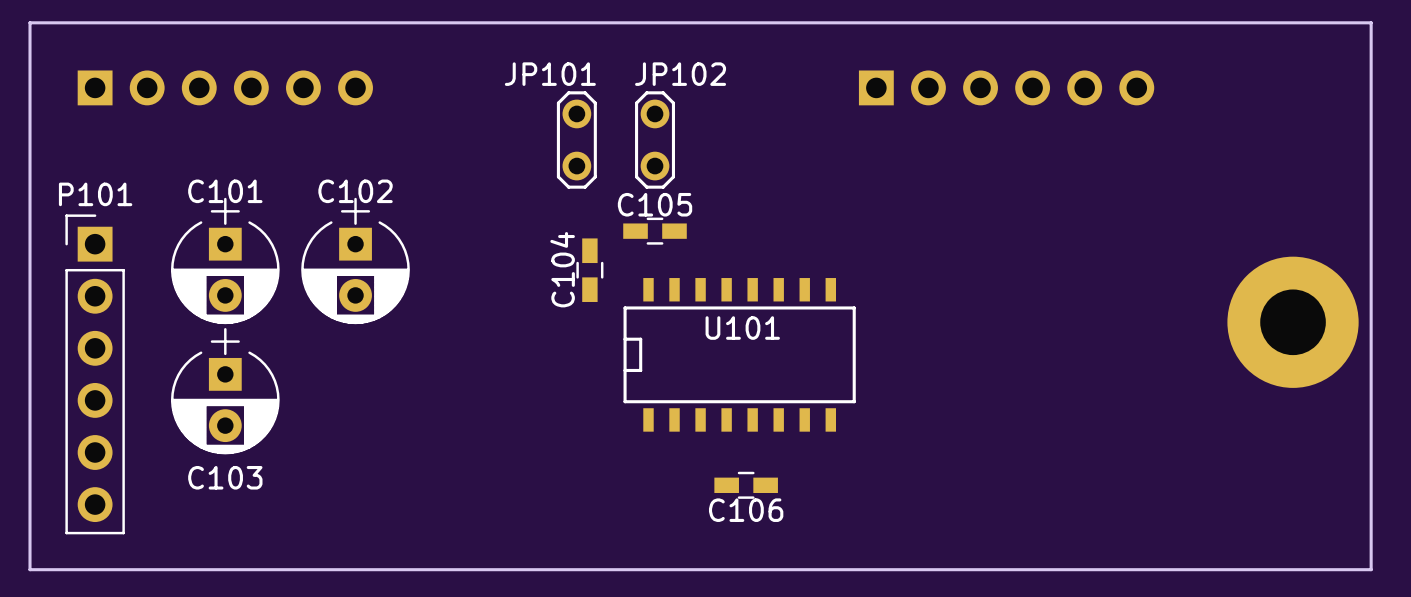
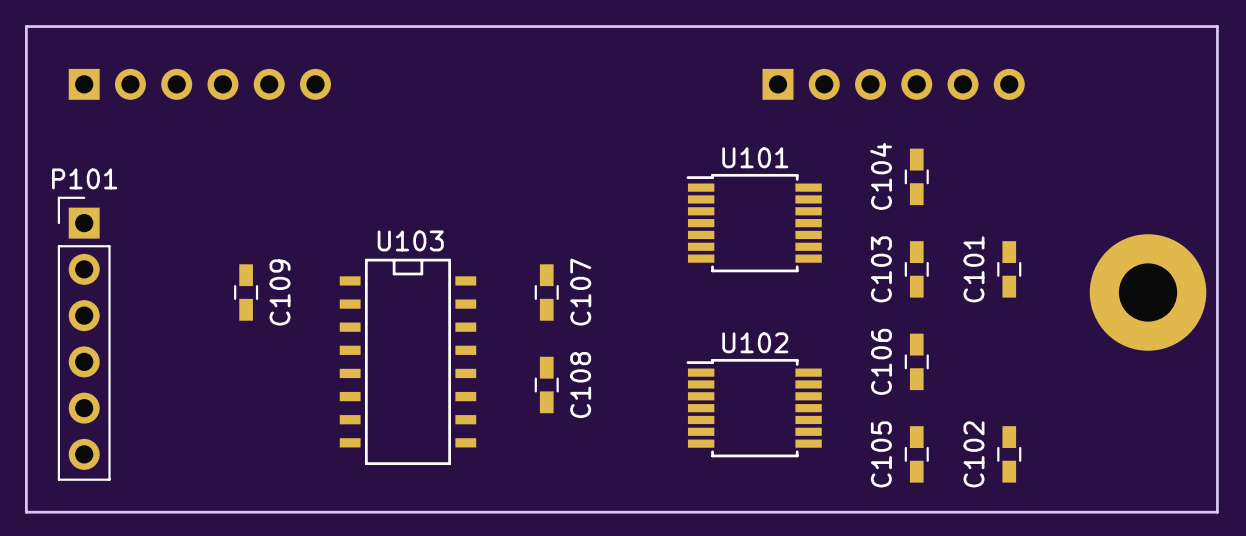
JP101: (576, 140) -> none
JP102: (655, 140) -> none
C101 name position: C101 (225, 191) -> C101 (973, 269)
C102 name position: C102 (355, 191) -> C102 (973, 454)
C101 footprint: [170, 197, 280, 325] -> [997, 241, 1022, 298]
C102 footprint: [301, 197, 410, 325] -> [997, 426, 1022, 483]
C105 name position: C105 (655, 204) -> C105 (881, 454)
C105 rotation: 0° (655, 231) -> 90° clockwise (916, 454)
C105 position: (655, 231) -> (916, 454)
C104 name position: C104 (562, 269) -> C104 (881, 176)
C104 position: (589, 270) -> (916, 176)
U101 footprint: [623, 278, 856, 432] -> [686, 173, 822, 273]
C109: none -> (246, 292)
C107: none -> (546, 292)
C103 footprint: [170, 328, 280, 455] -> [904, 241, 929, 298]
U101 name position: U101 (742, 328) -> U101 (755, 157)
U103: none -> (407, 361)
C108: none -> (546, 385)
U102: none -> (754, 408)
C103 name position: C103 (225, 477) -> C103 (881, 269)
C106 rotation: 0° (746, 485) -> 90° clockwise (916, 361)
C106 position: (746, 485) -> (916, 361)

